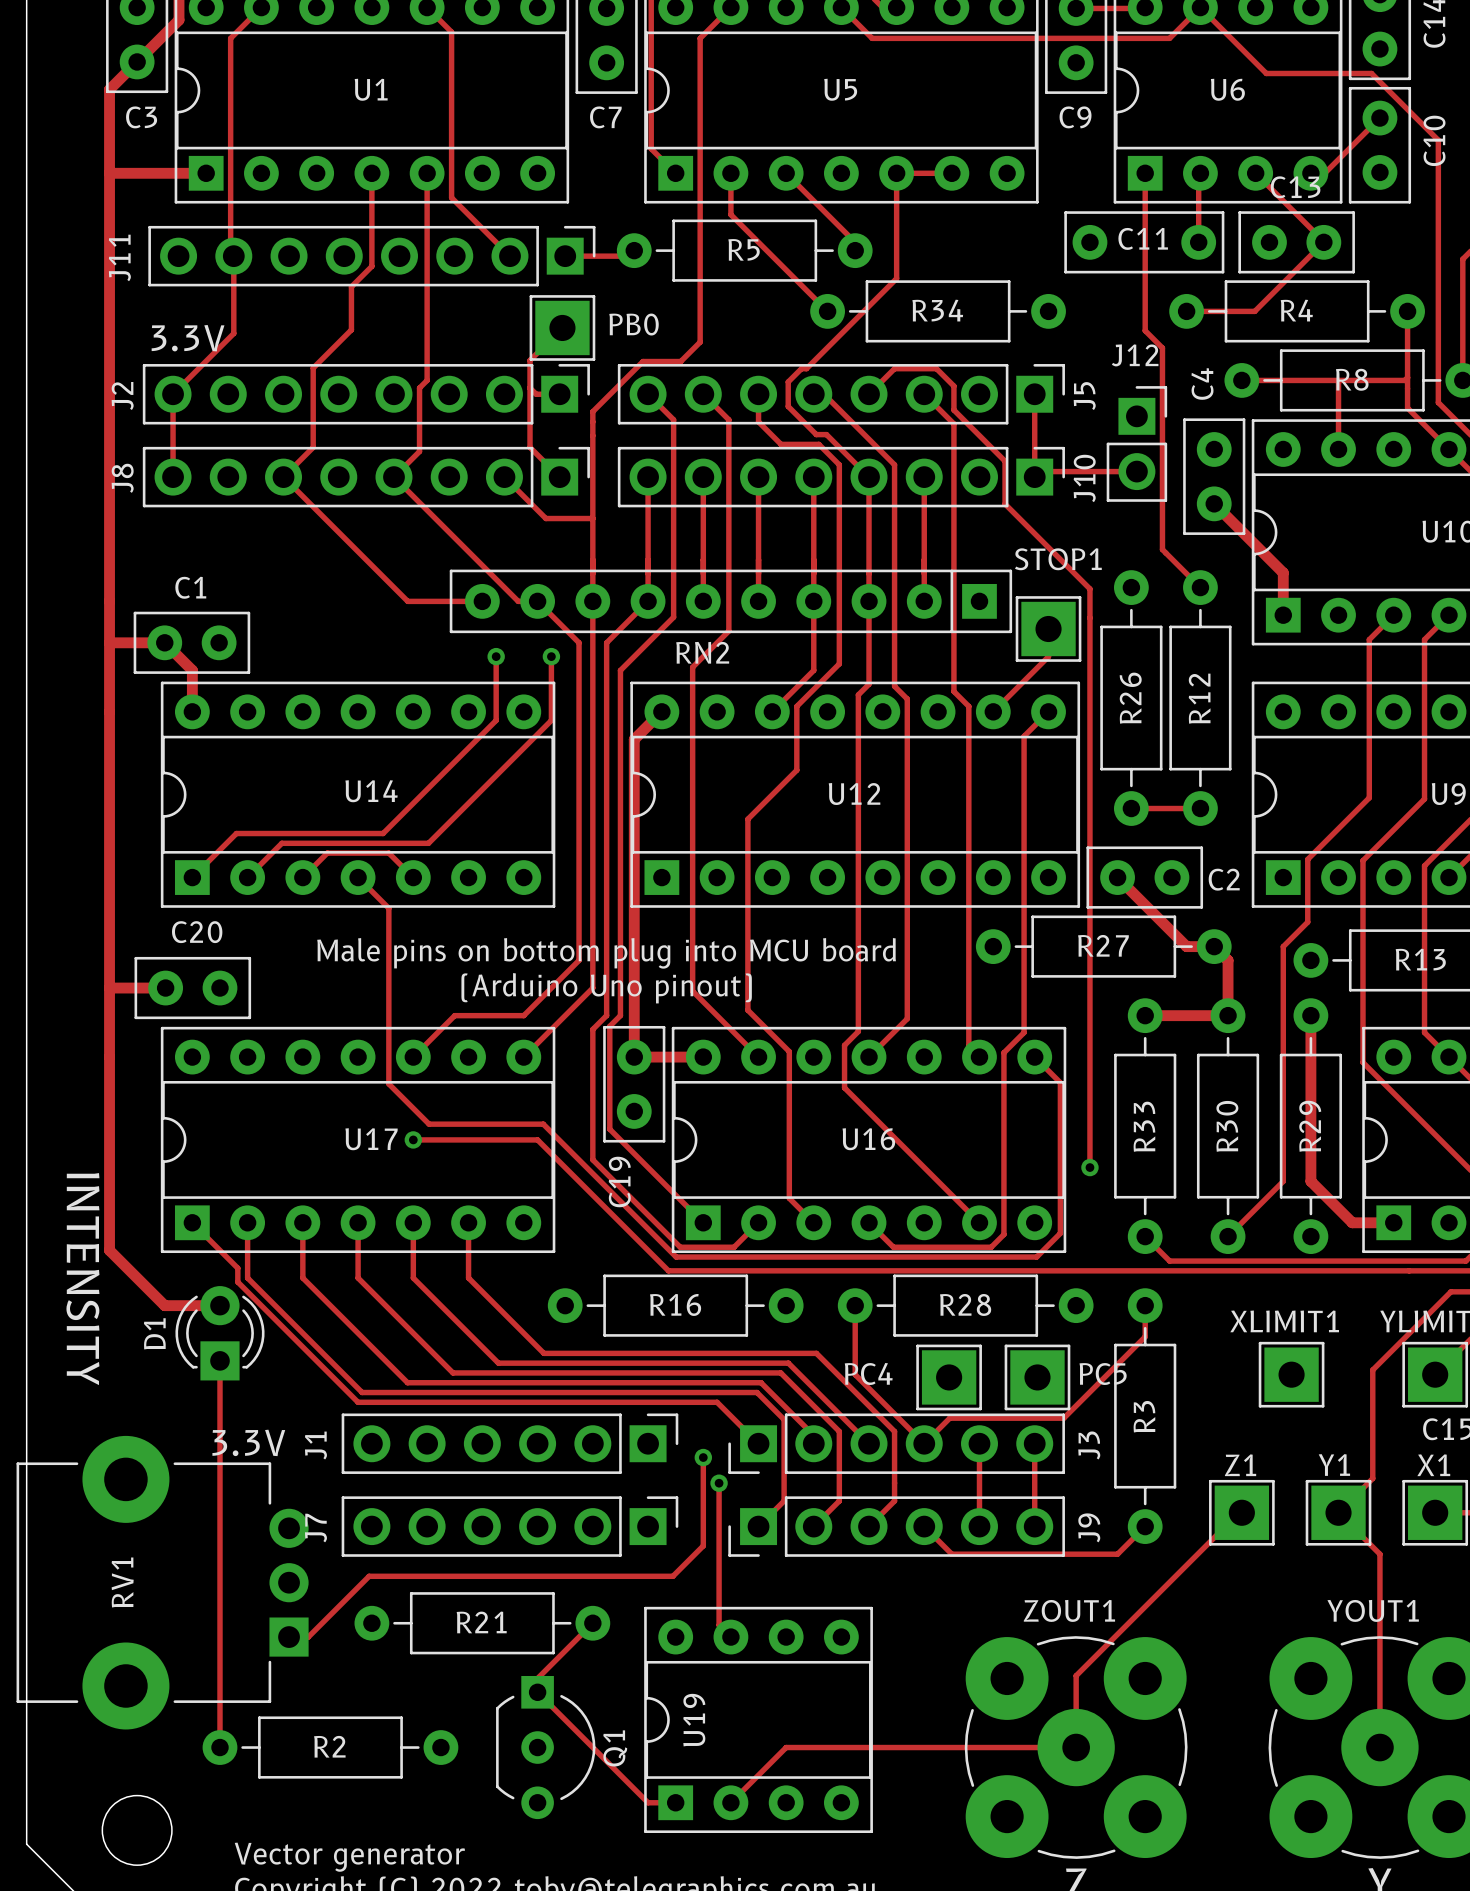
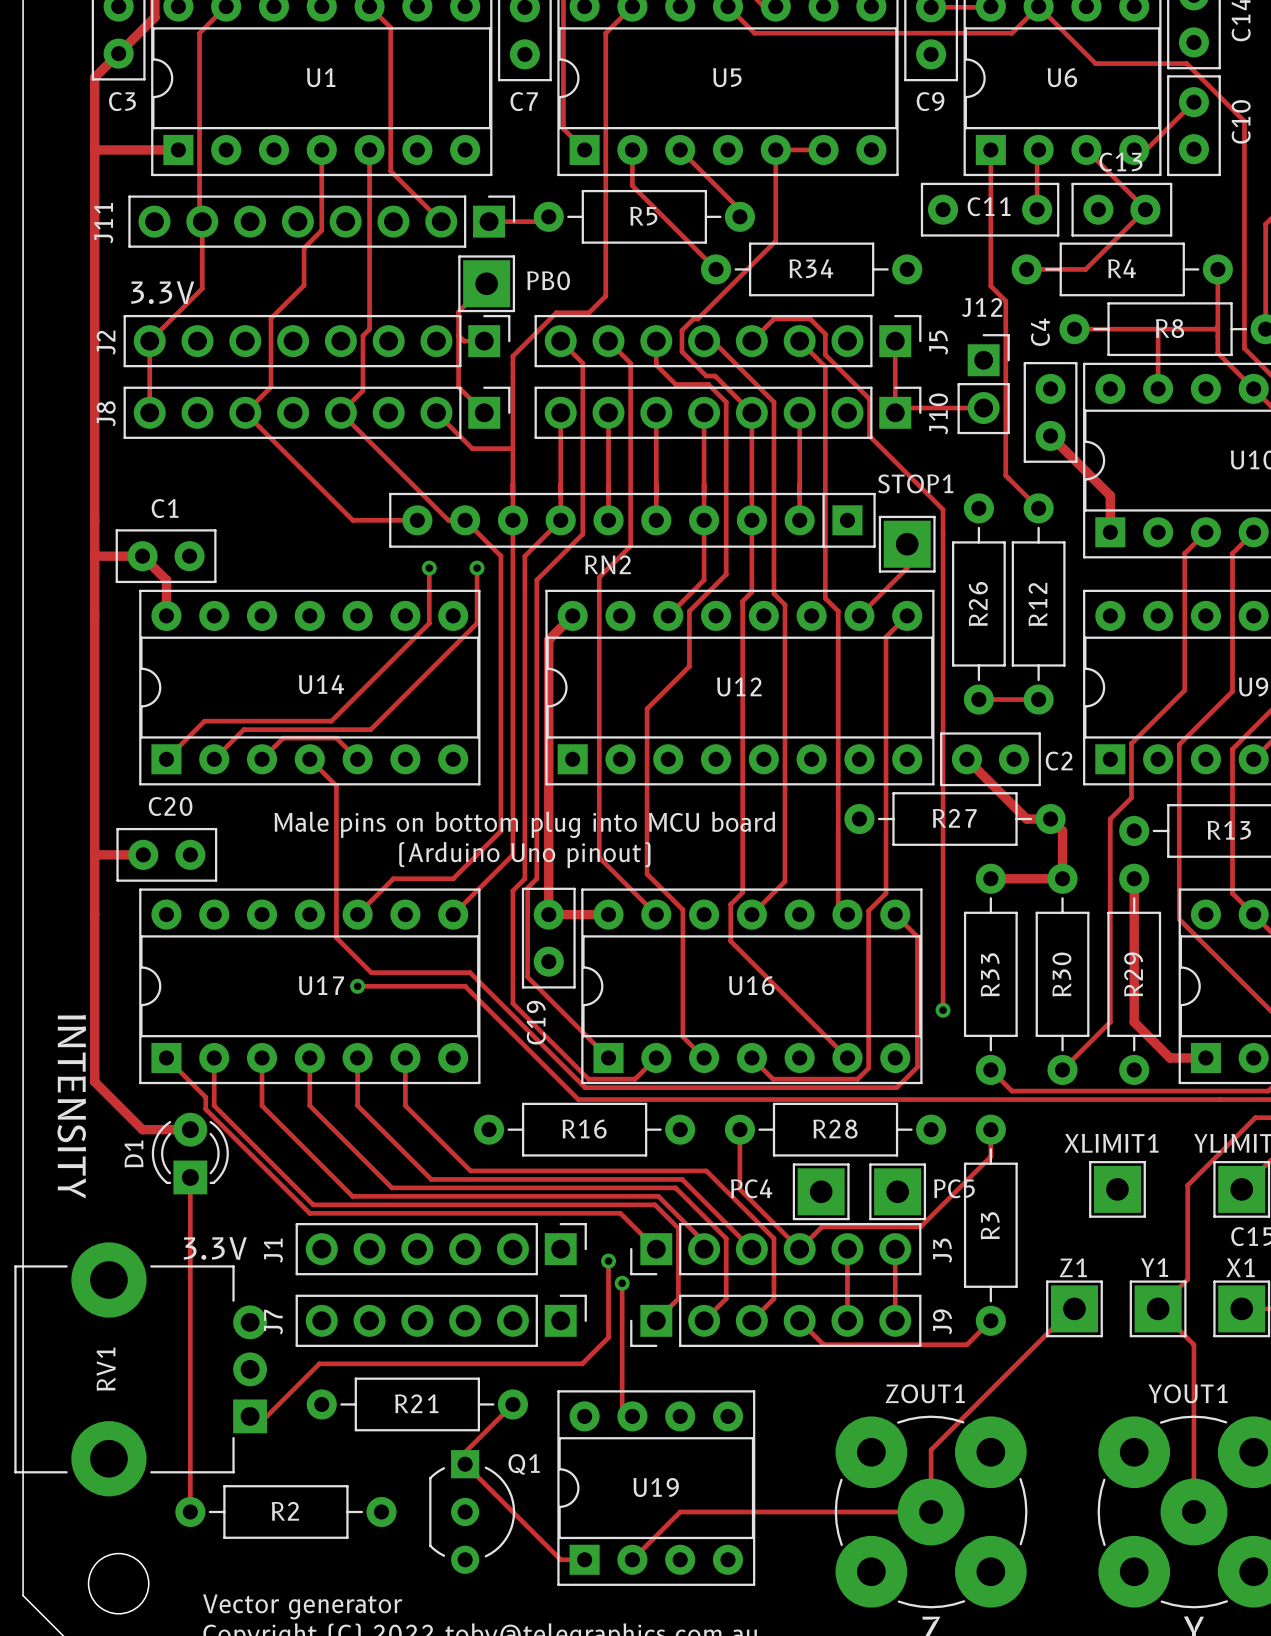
U19 name rotation: 0° (694, 1720) -> 90° clockwise (656, 1487)
Q1 name rotation: 0° (615, 1748) -> 90° clockwise (524, 1464)

